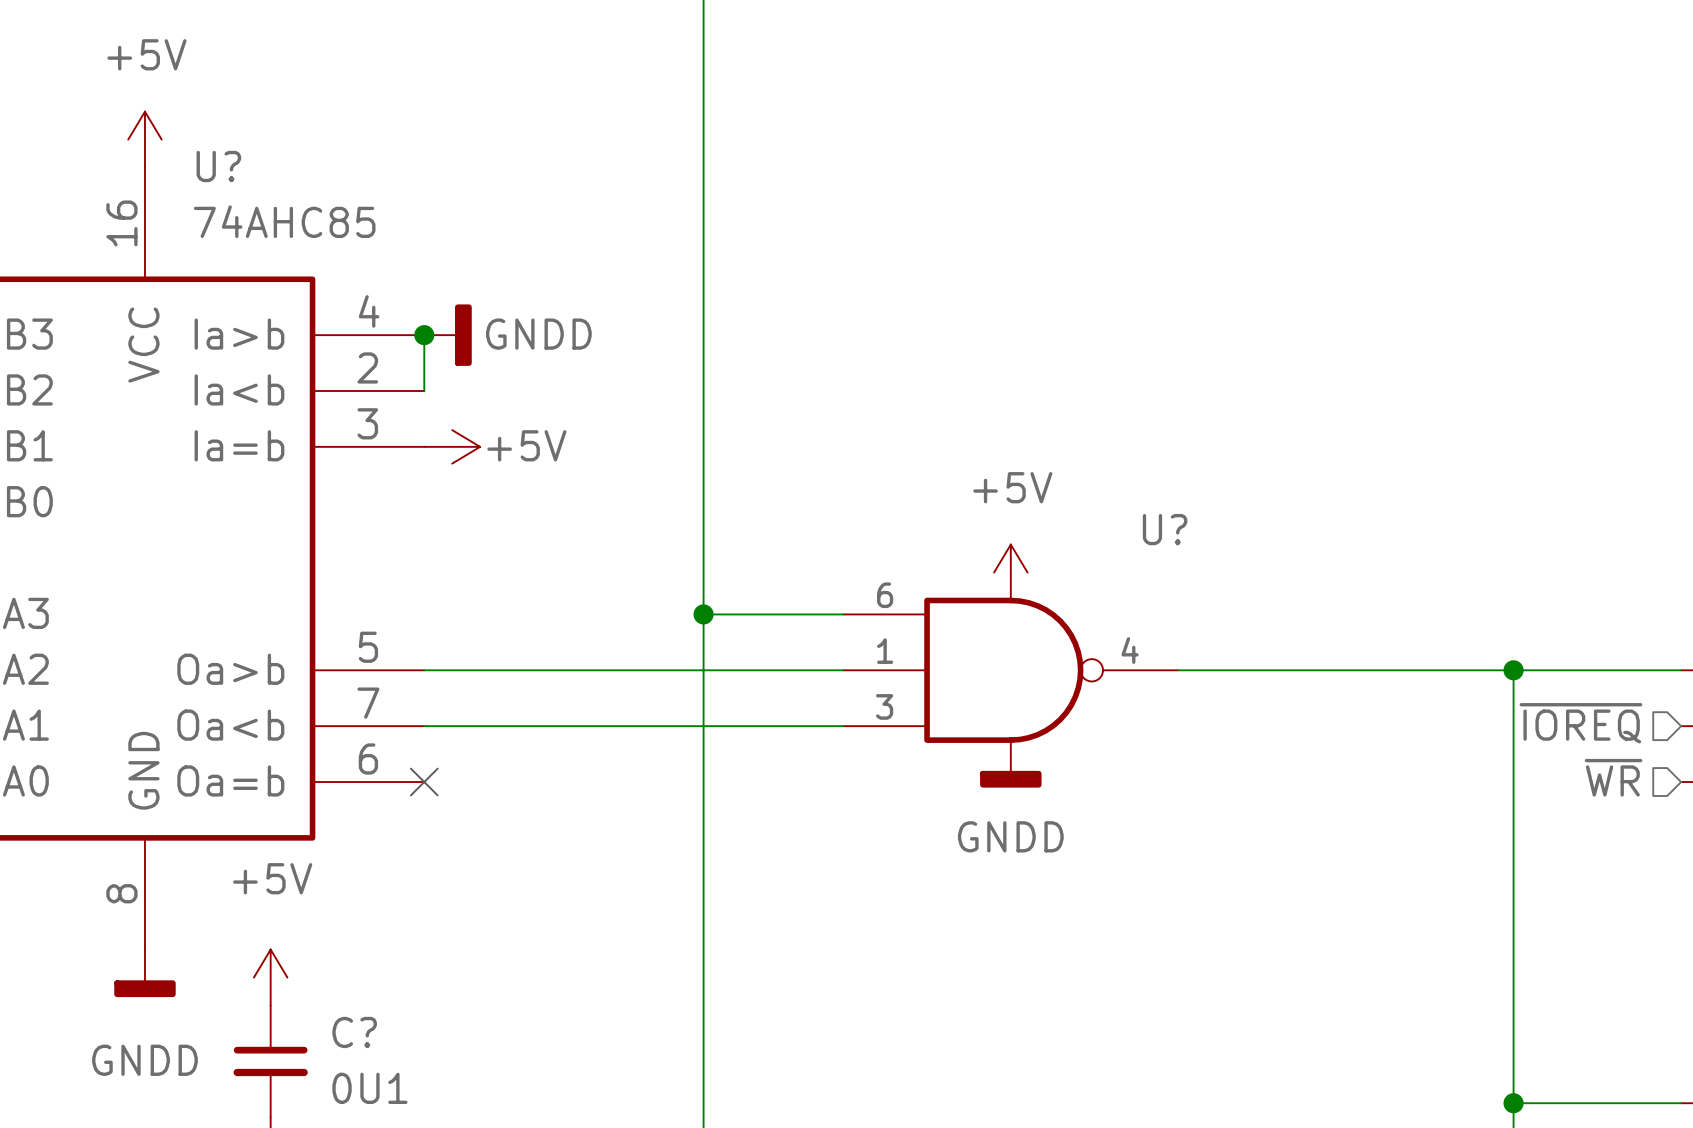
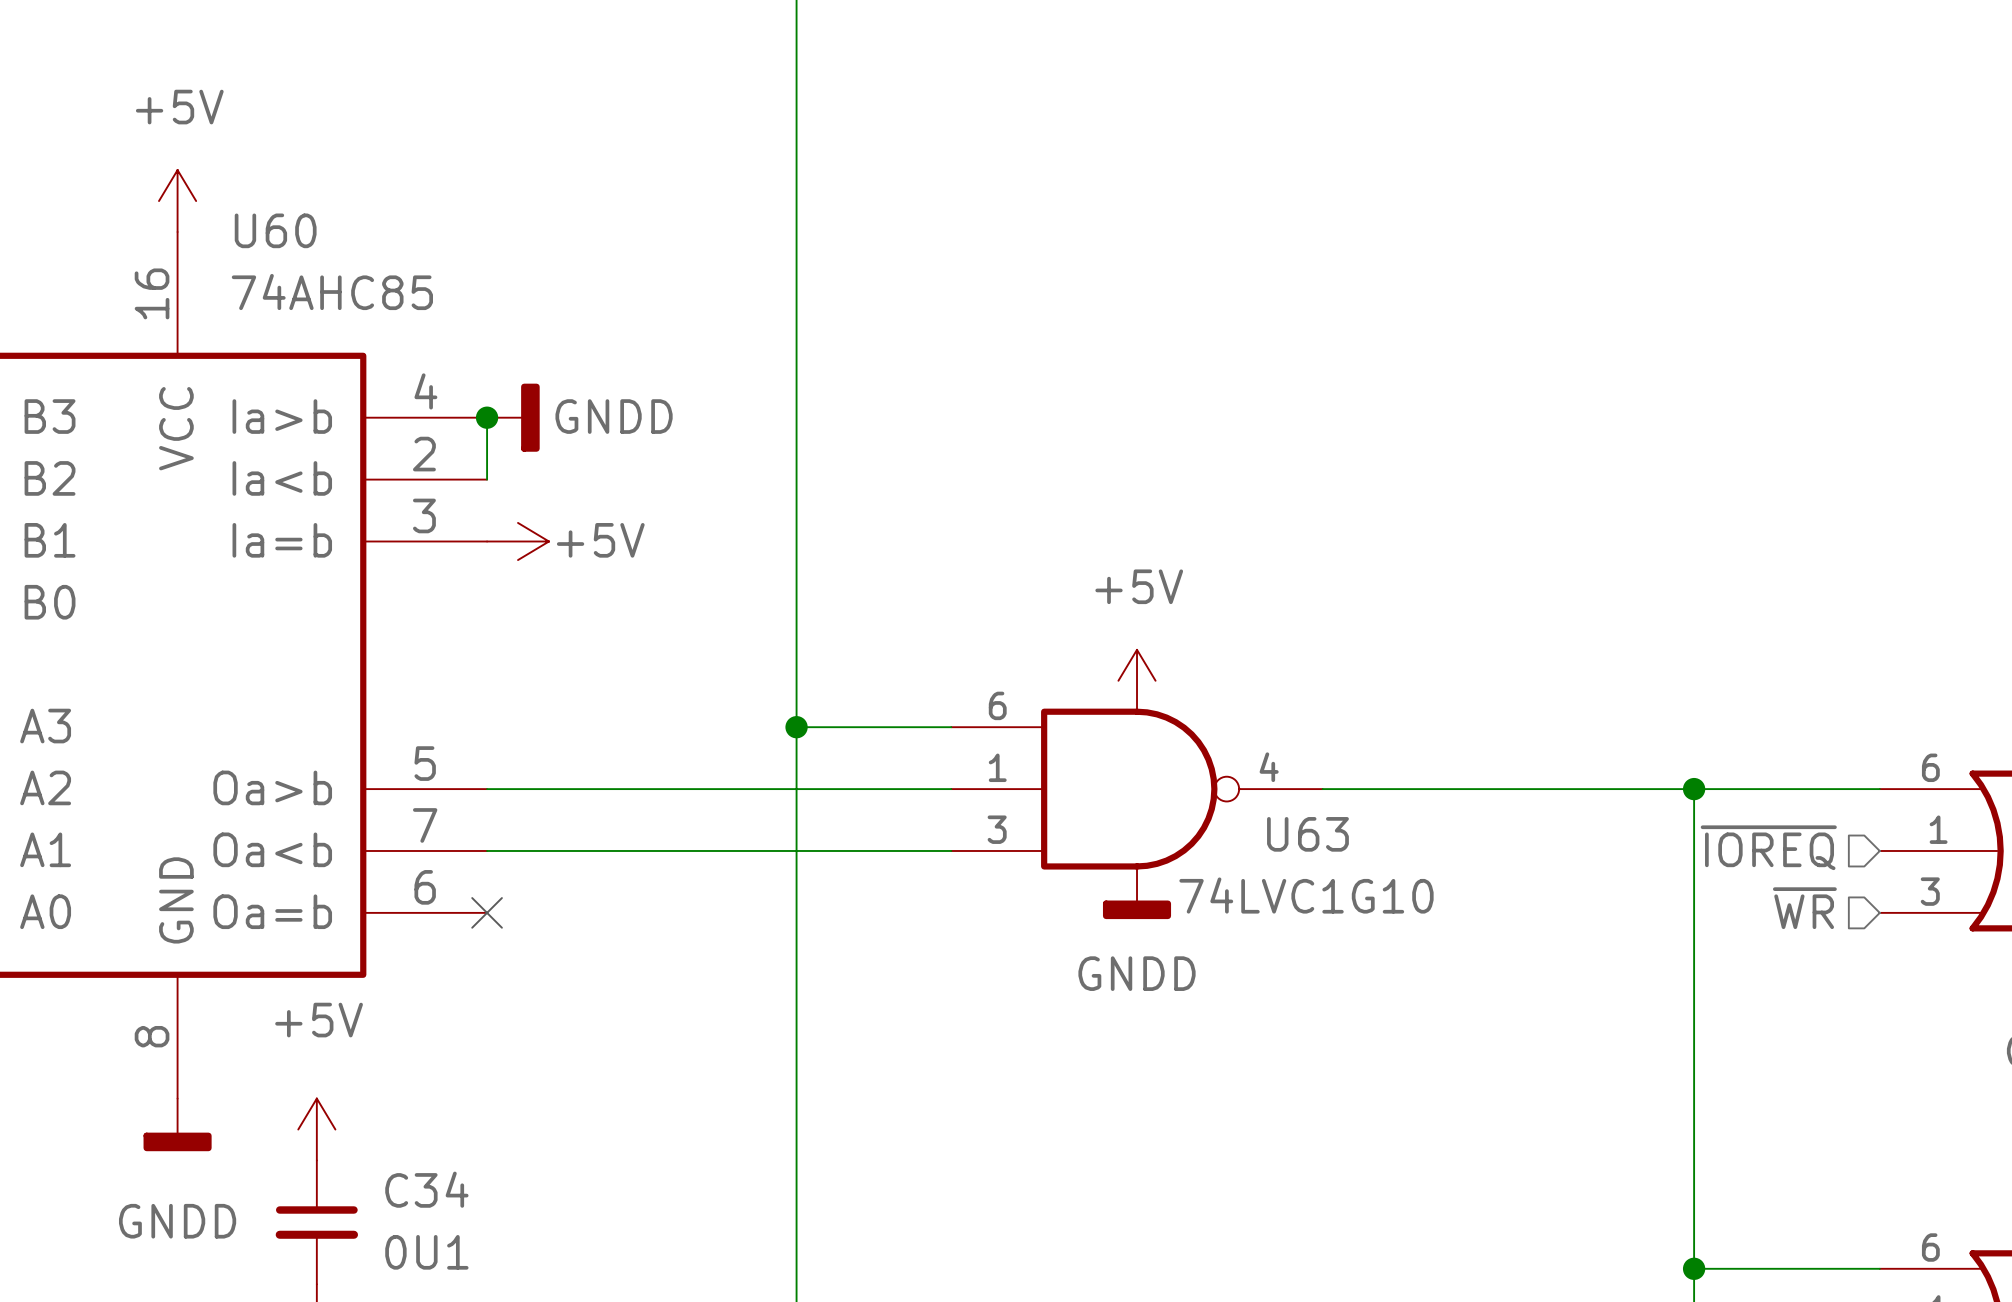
U? name: U? (218, 166) -> U60 (275, 230)
U? name: U? (1165, 529) -> U63 (1307, 834)
U? value: none -> 74LVC1G10 (1306, 895)
C? name: C? (354, 1032) -> C34 (426, 1189)

